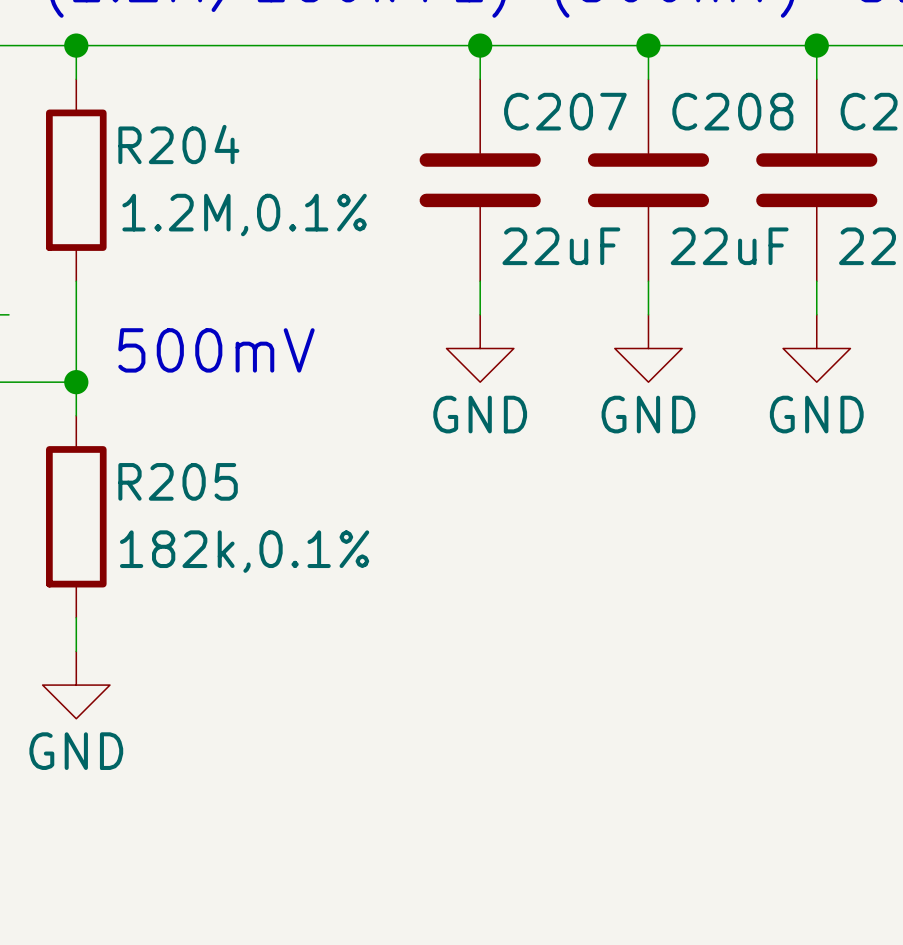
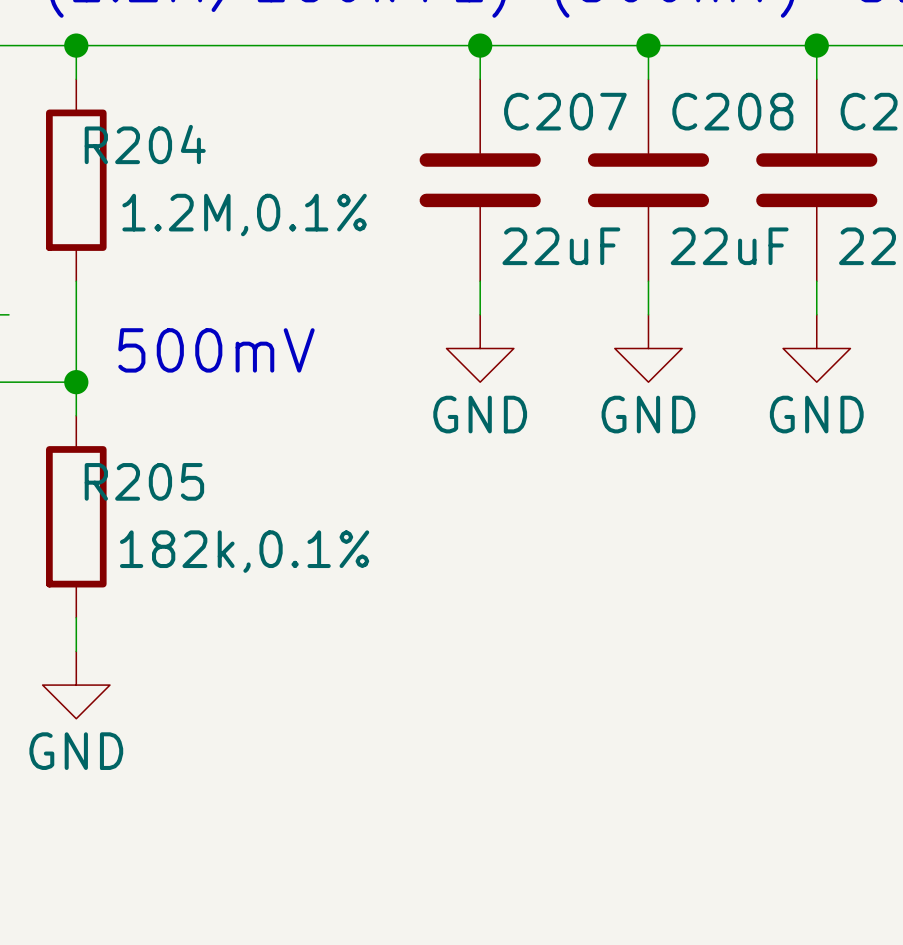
R204 name position: R204 (178, 144) -> R204 (145, 144)
R205 name position: R205 (178, 481) -> R205 (144, 481)

